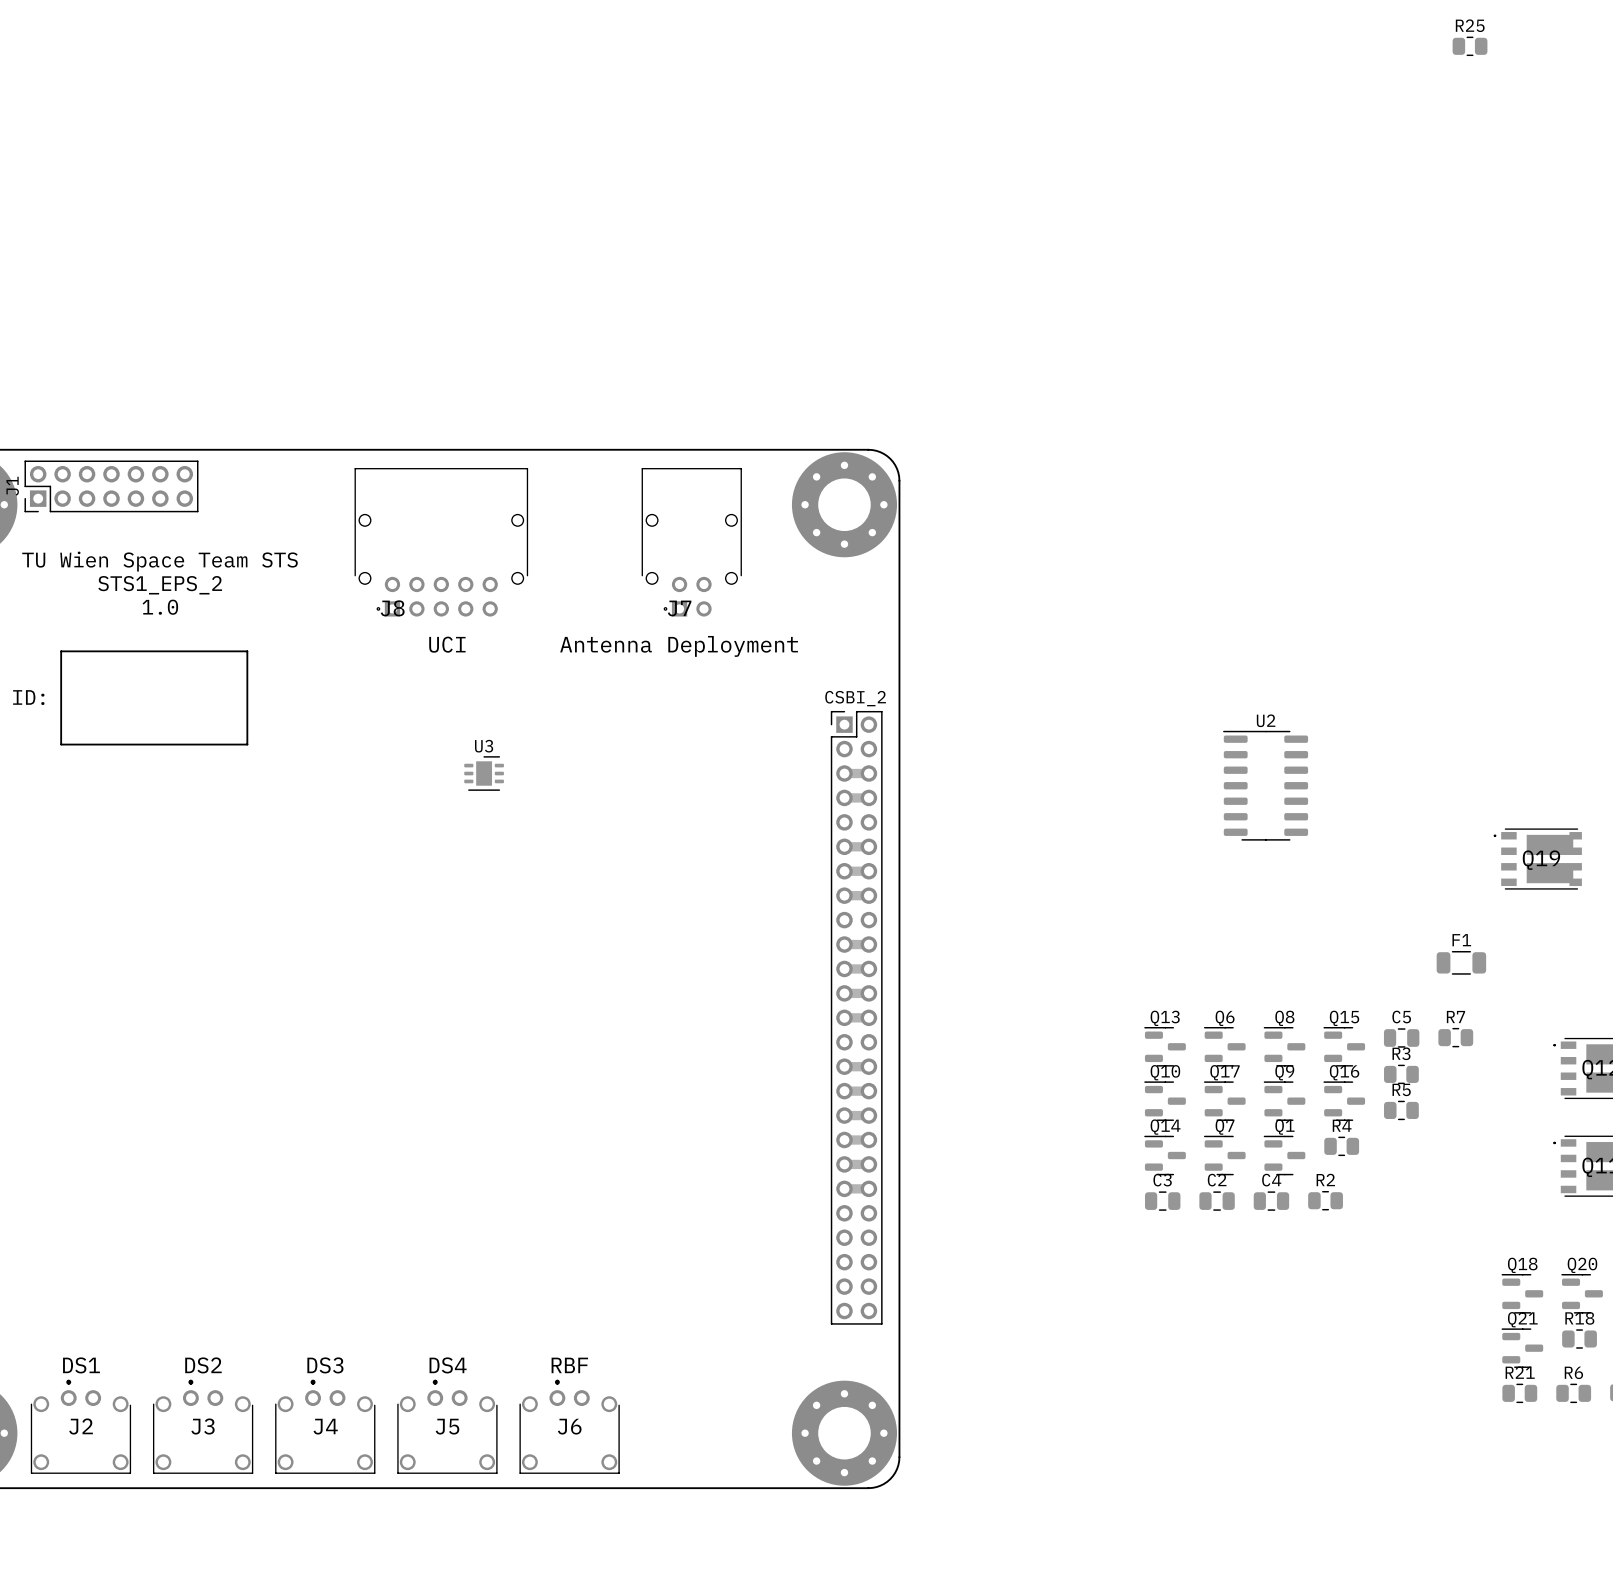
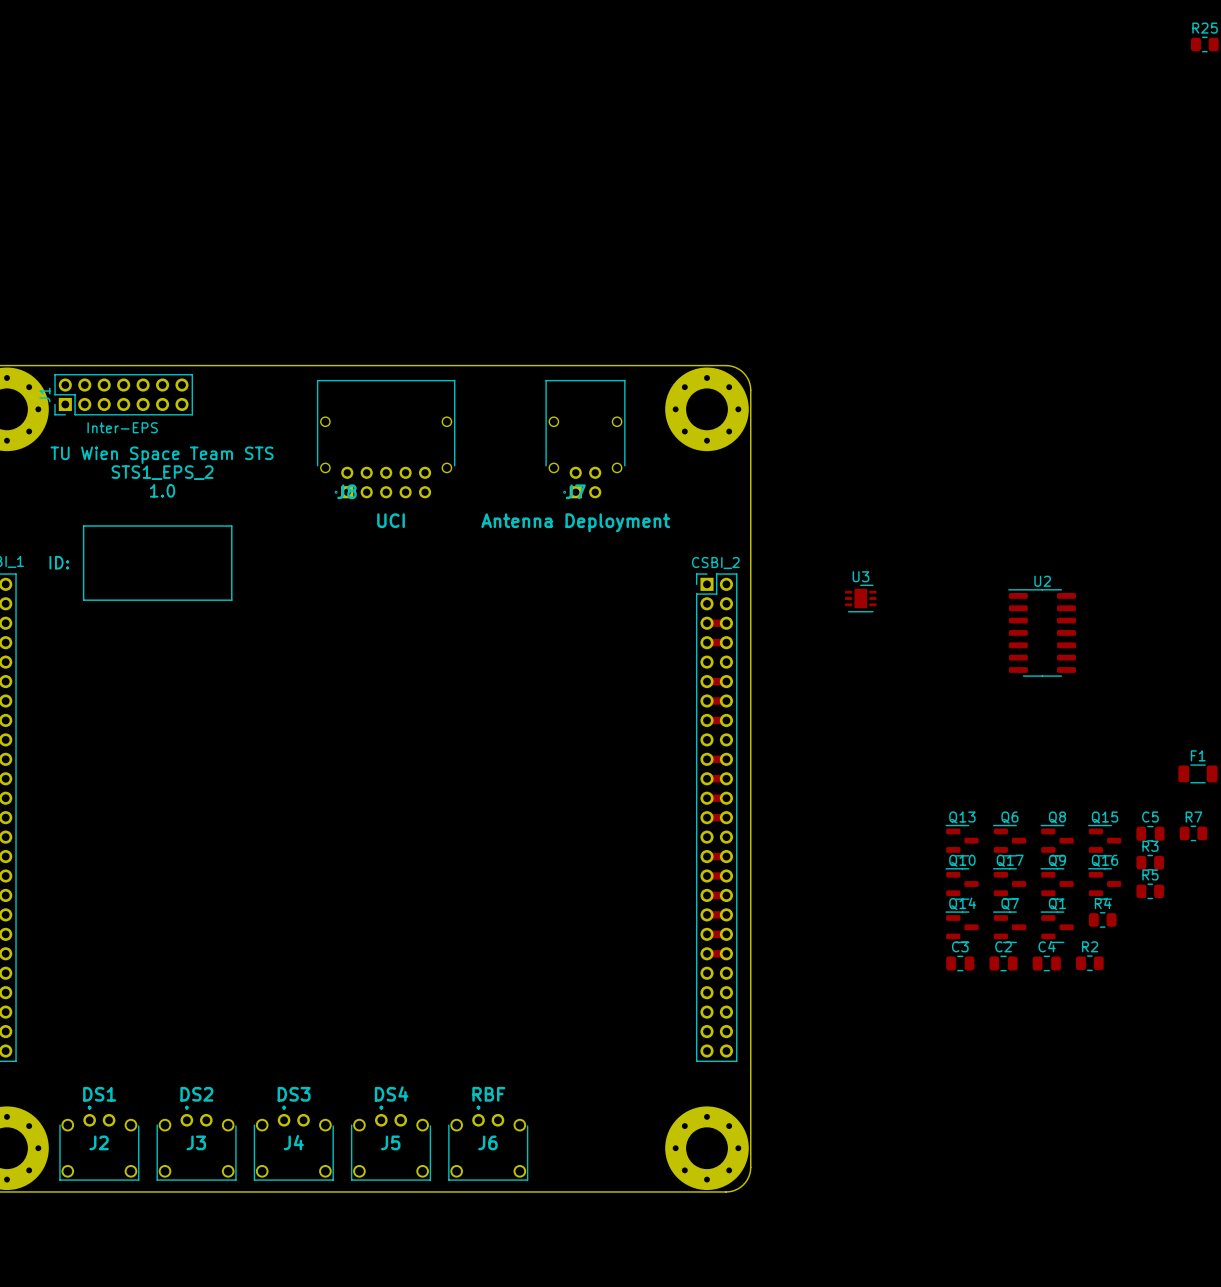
J1 value: none -> Inter-EPS (122, 427)
U3 position: (484, 773) -> (860, 598)

